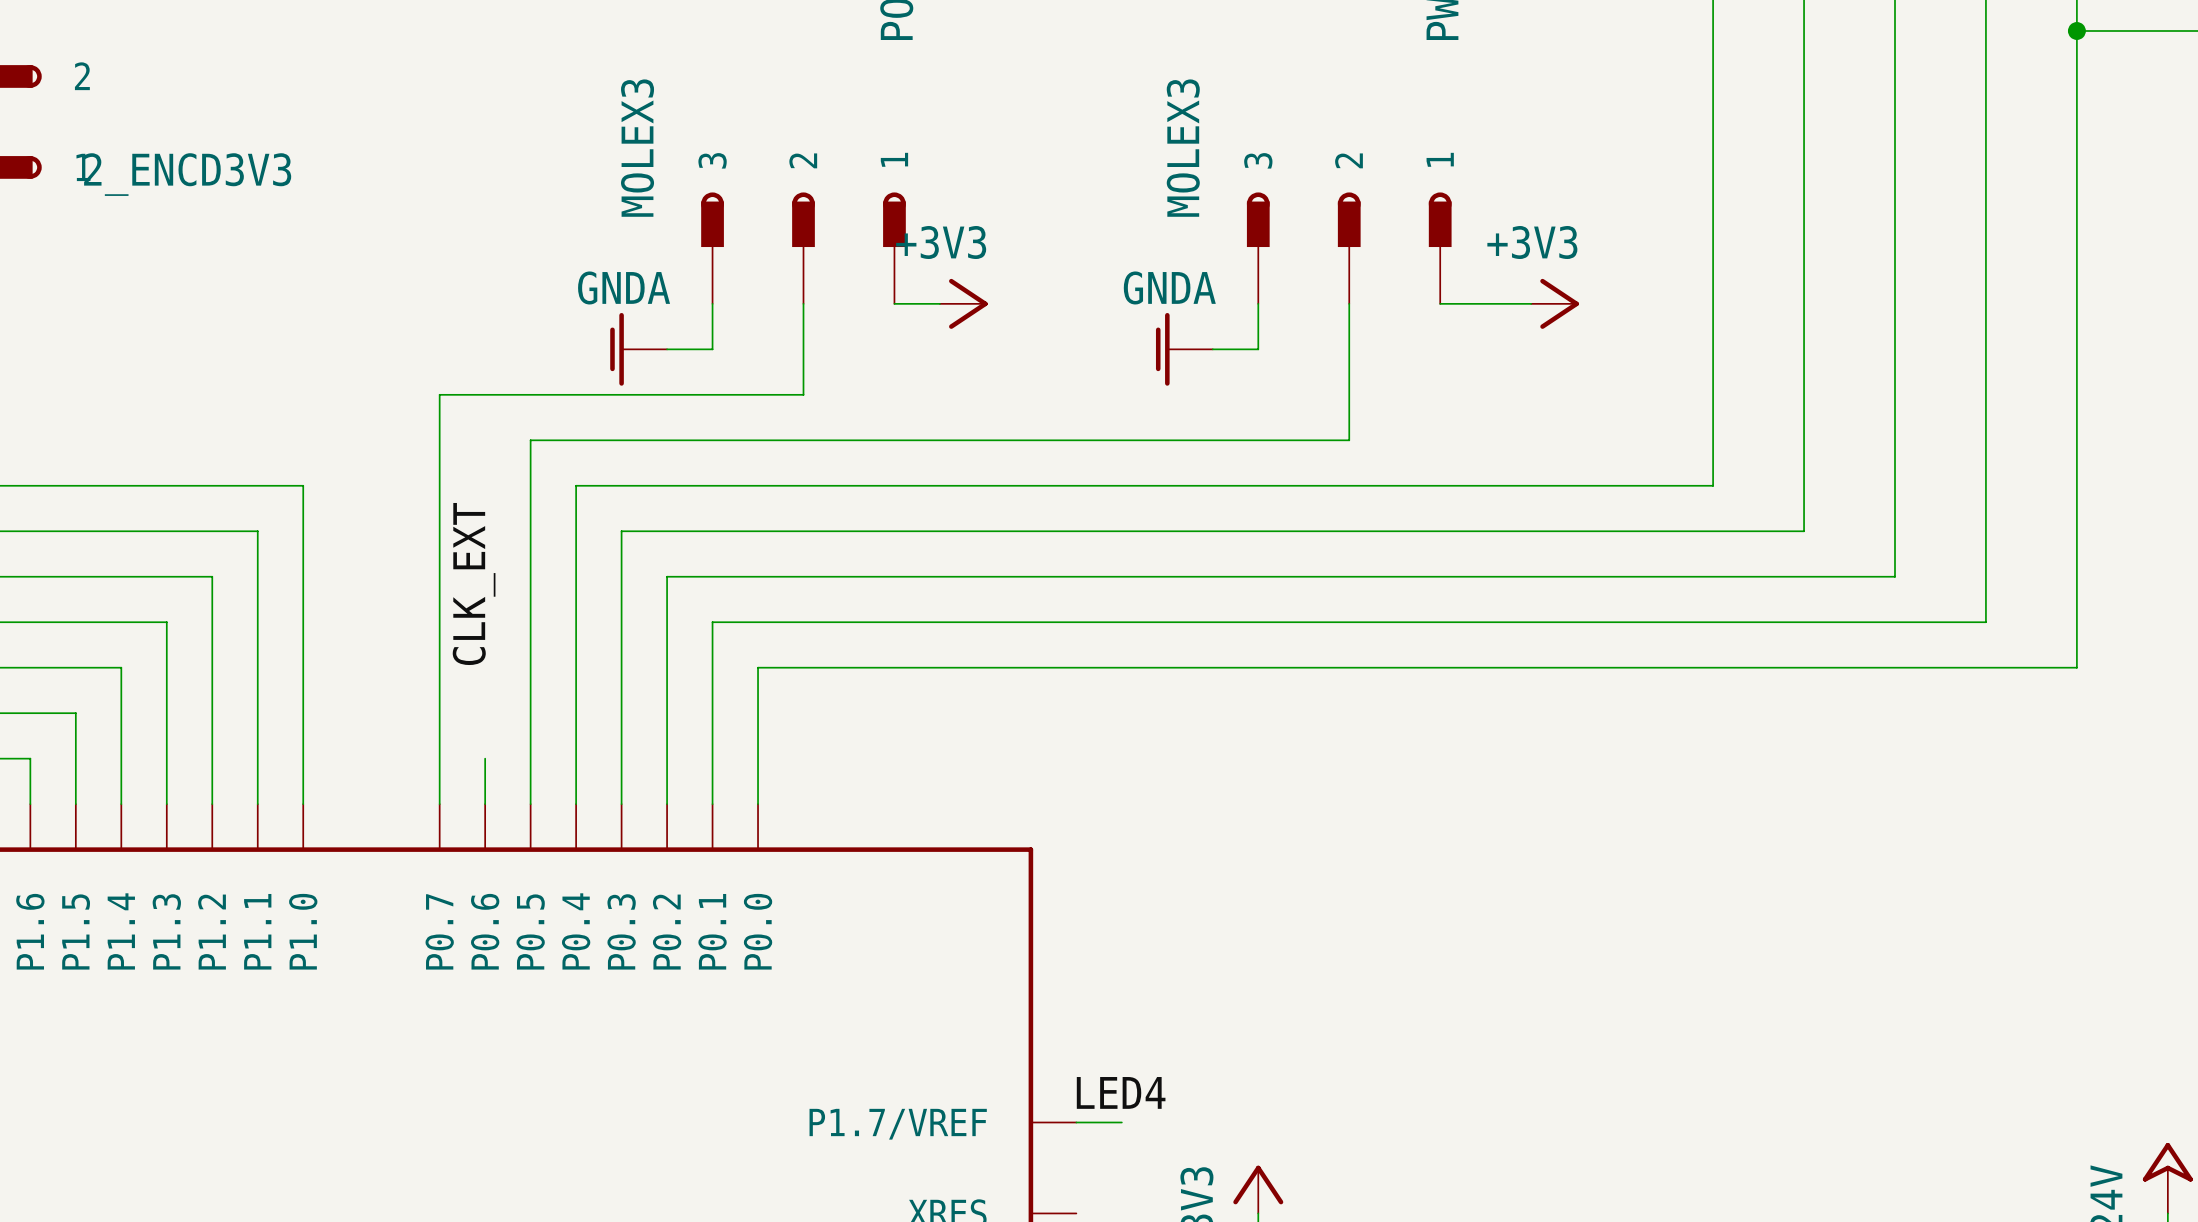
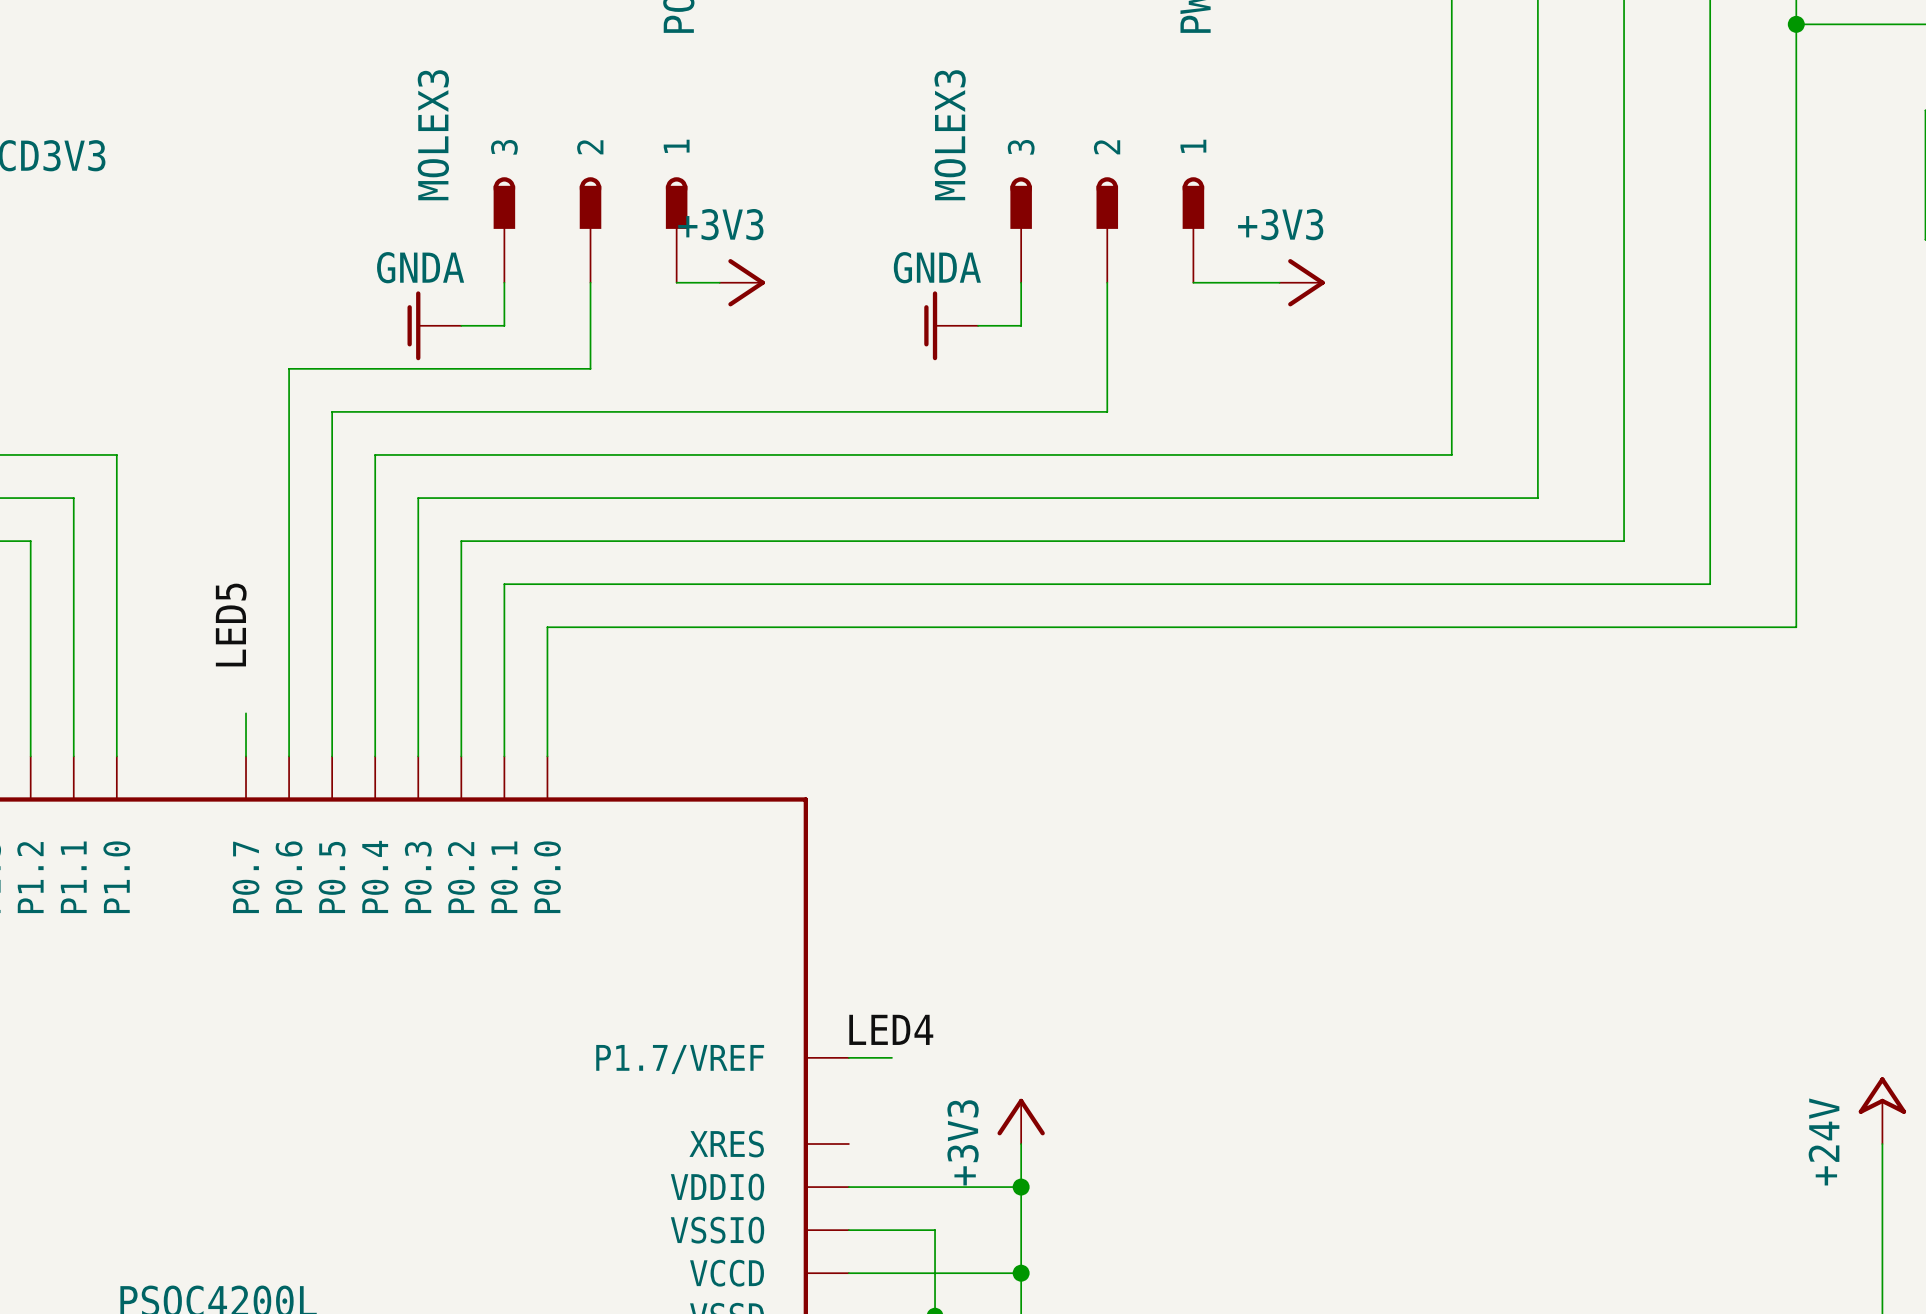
wire: (485, 394) (439, 394) (439, 758) -> (289, 368) (289, 713)
label: CLK_EXT (474, 584) -> none
label: none -> LED5 (231, 625)

